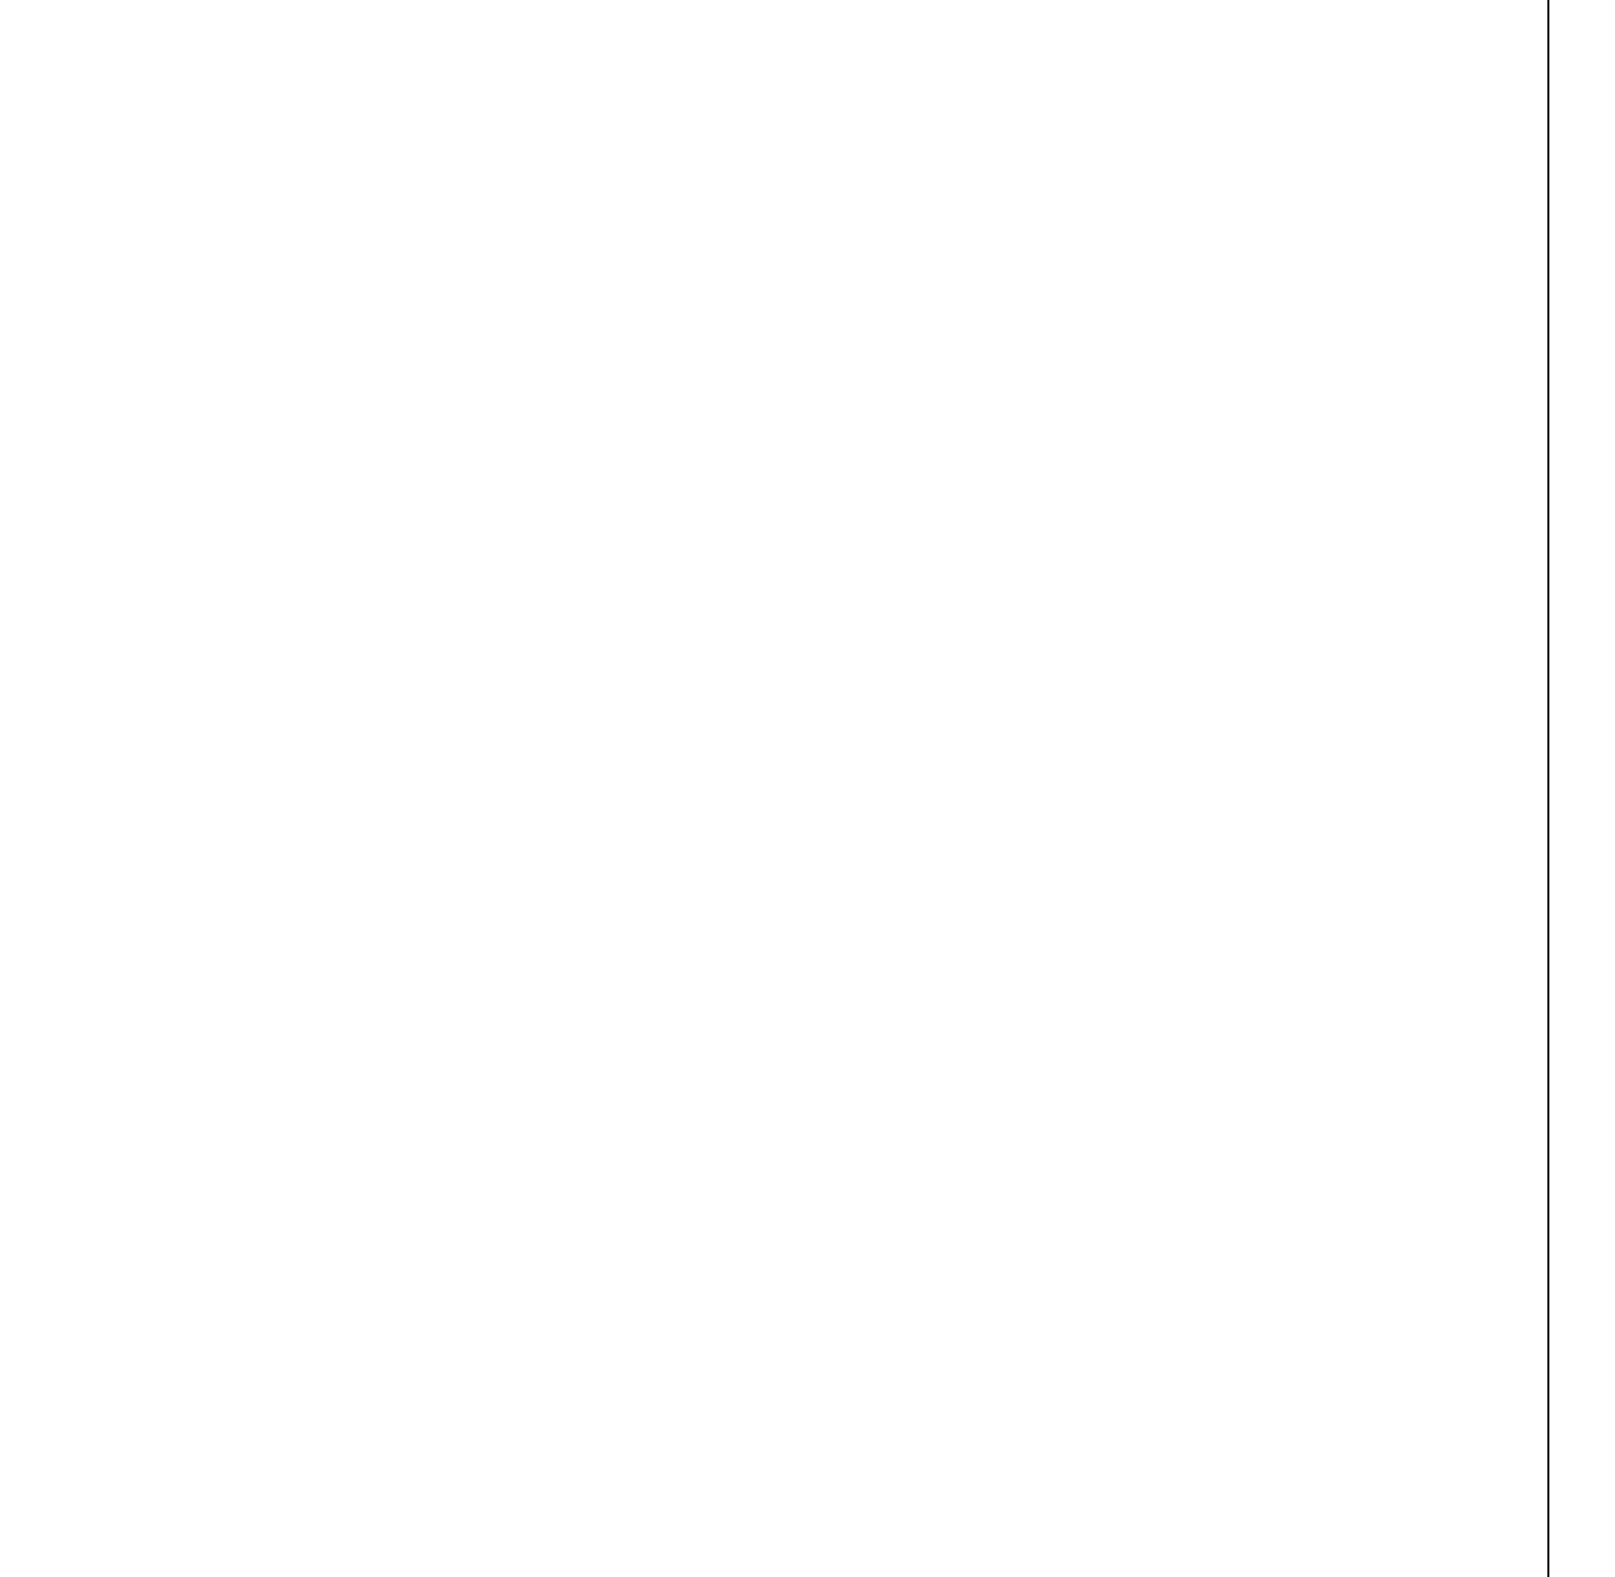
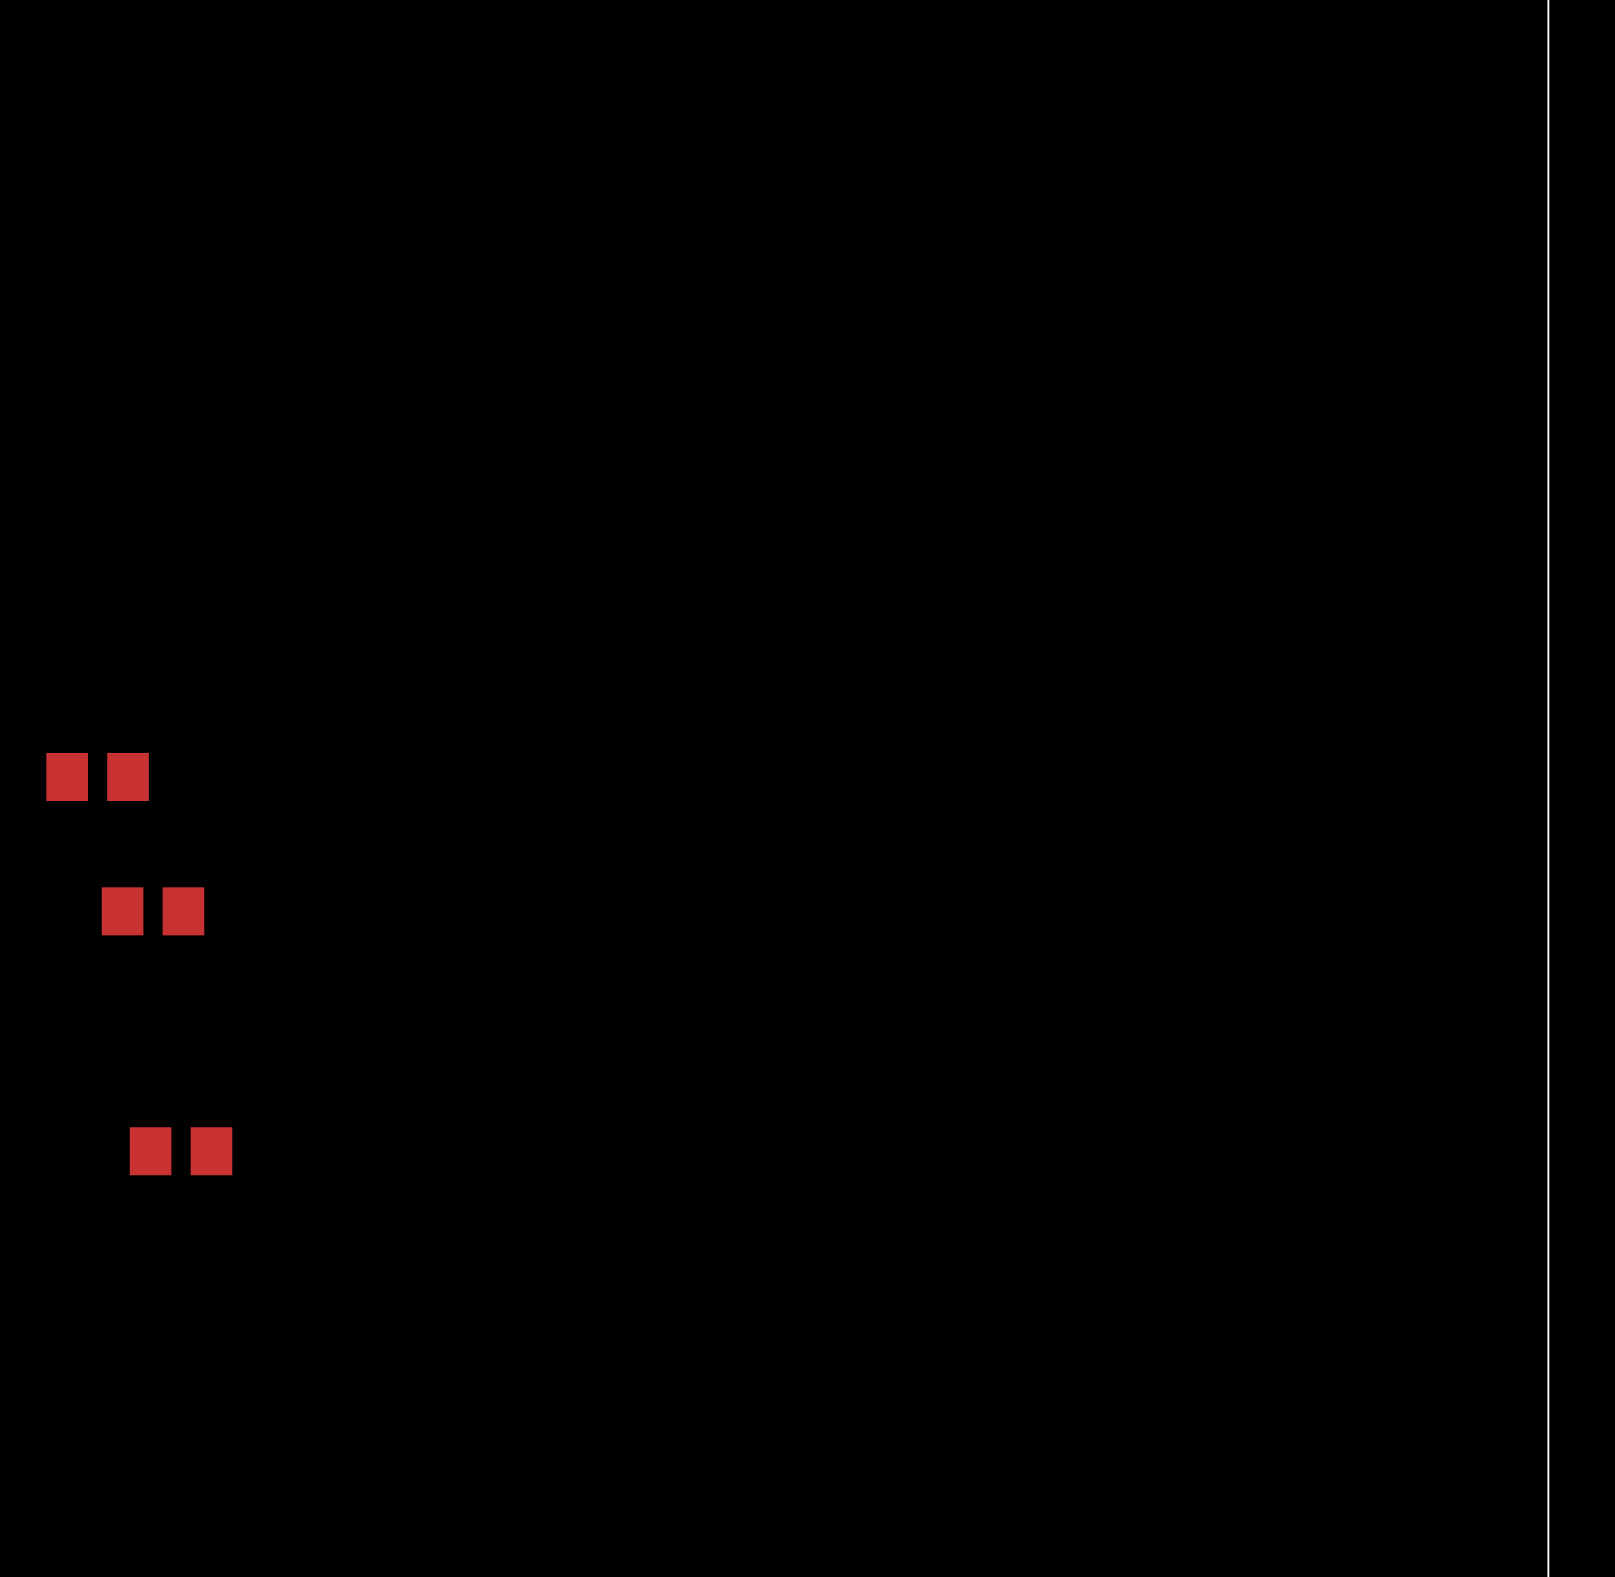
part: none -> (97, 776)
part: none -> (153, 911)
part: none -> (181, 1151)

